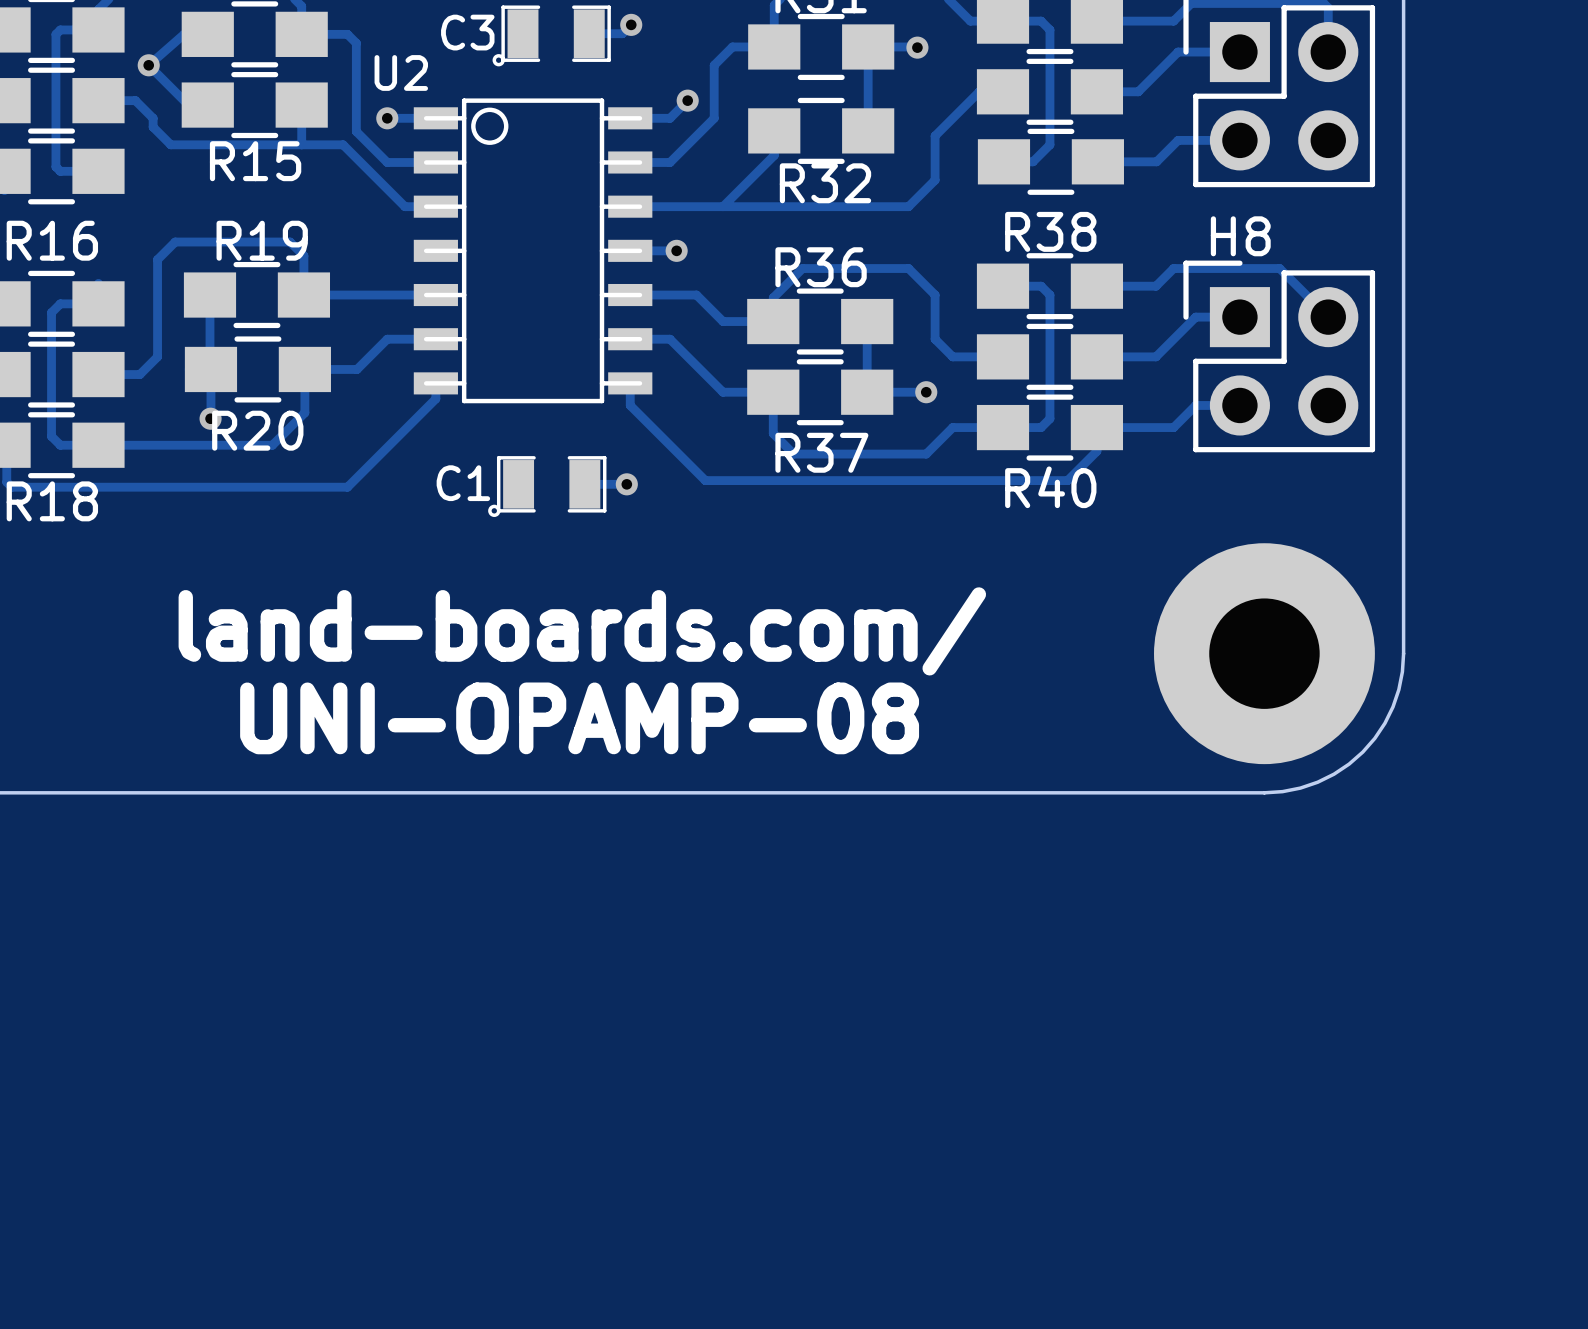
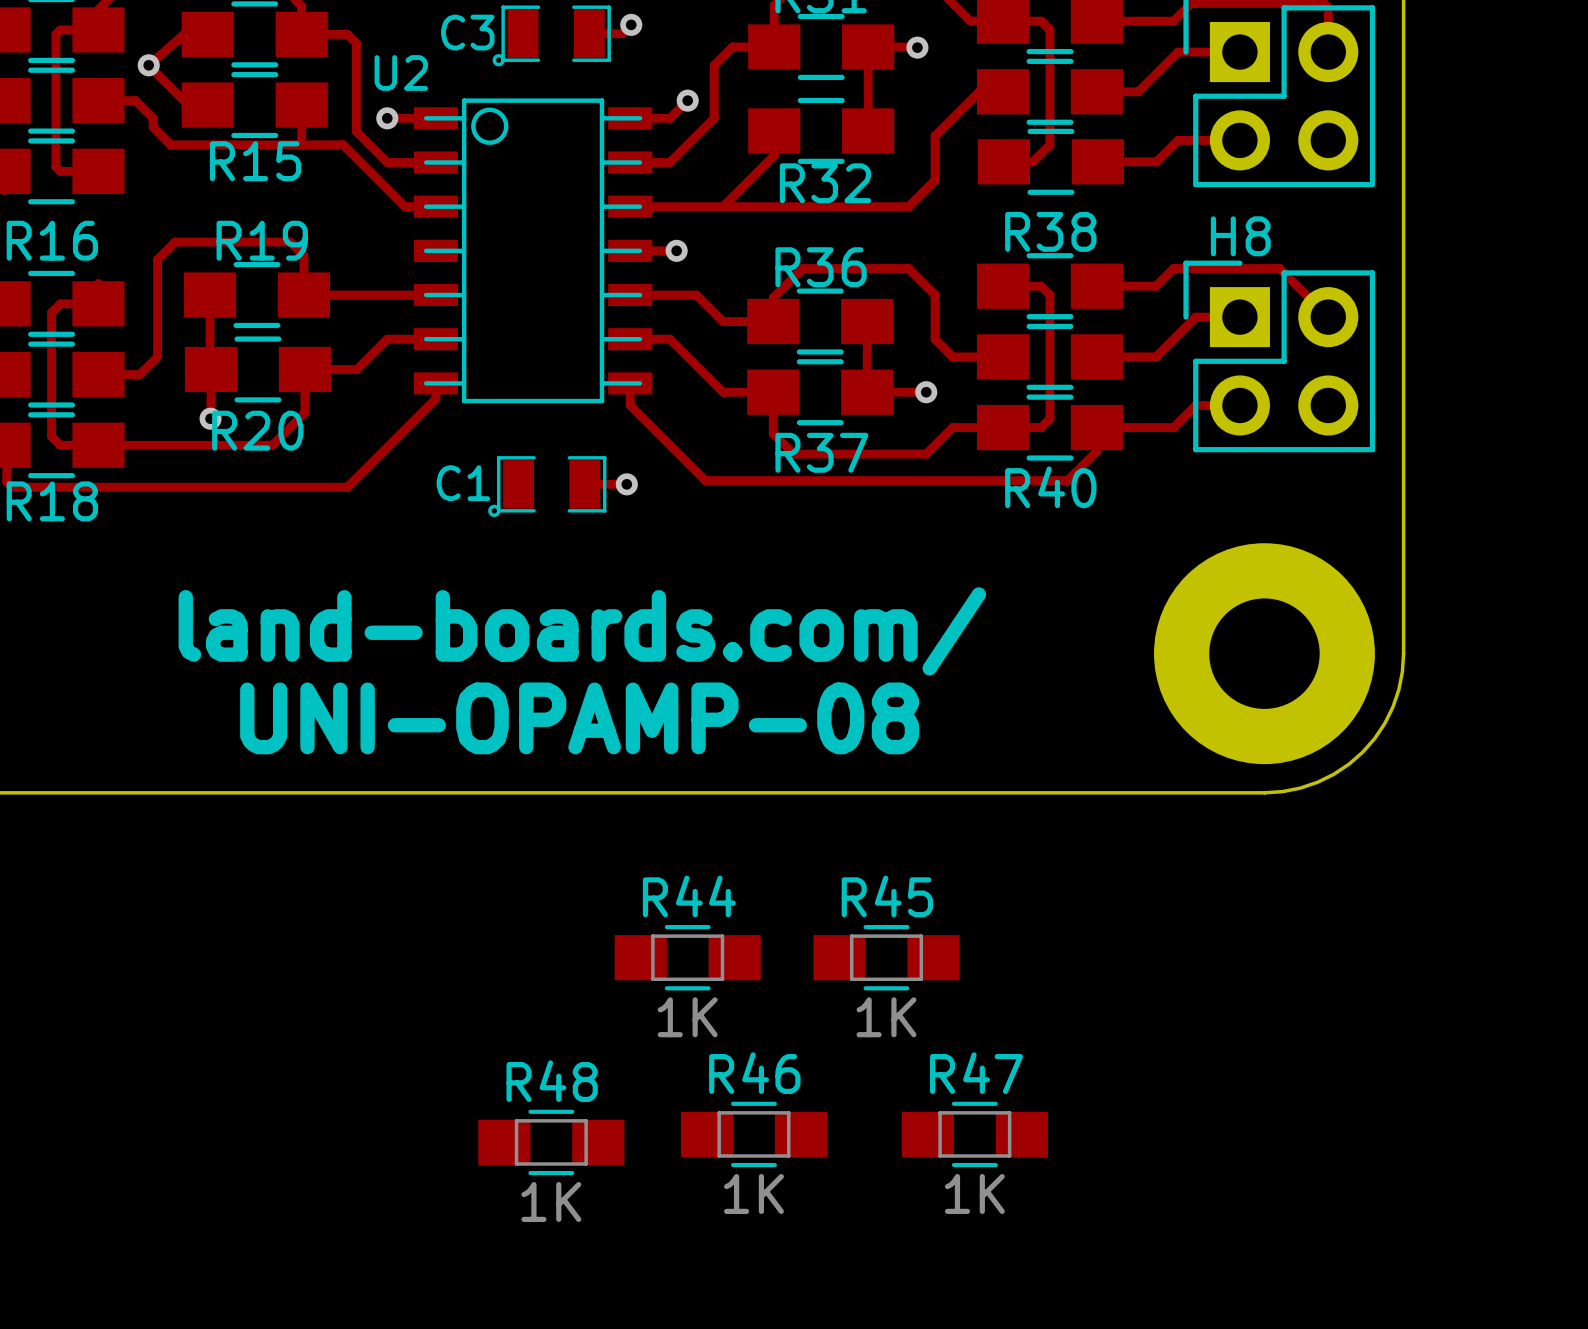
R44: none -> 1K (687, 957)
R45: none -> 1K (886, 957)
R46: none -> 1K (753, 1134)
R47: none -> 1K (974, 1134)
R48: none -> 1K (551, 1142)

